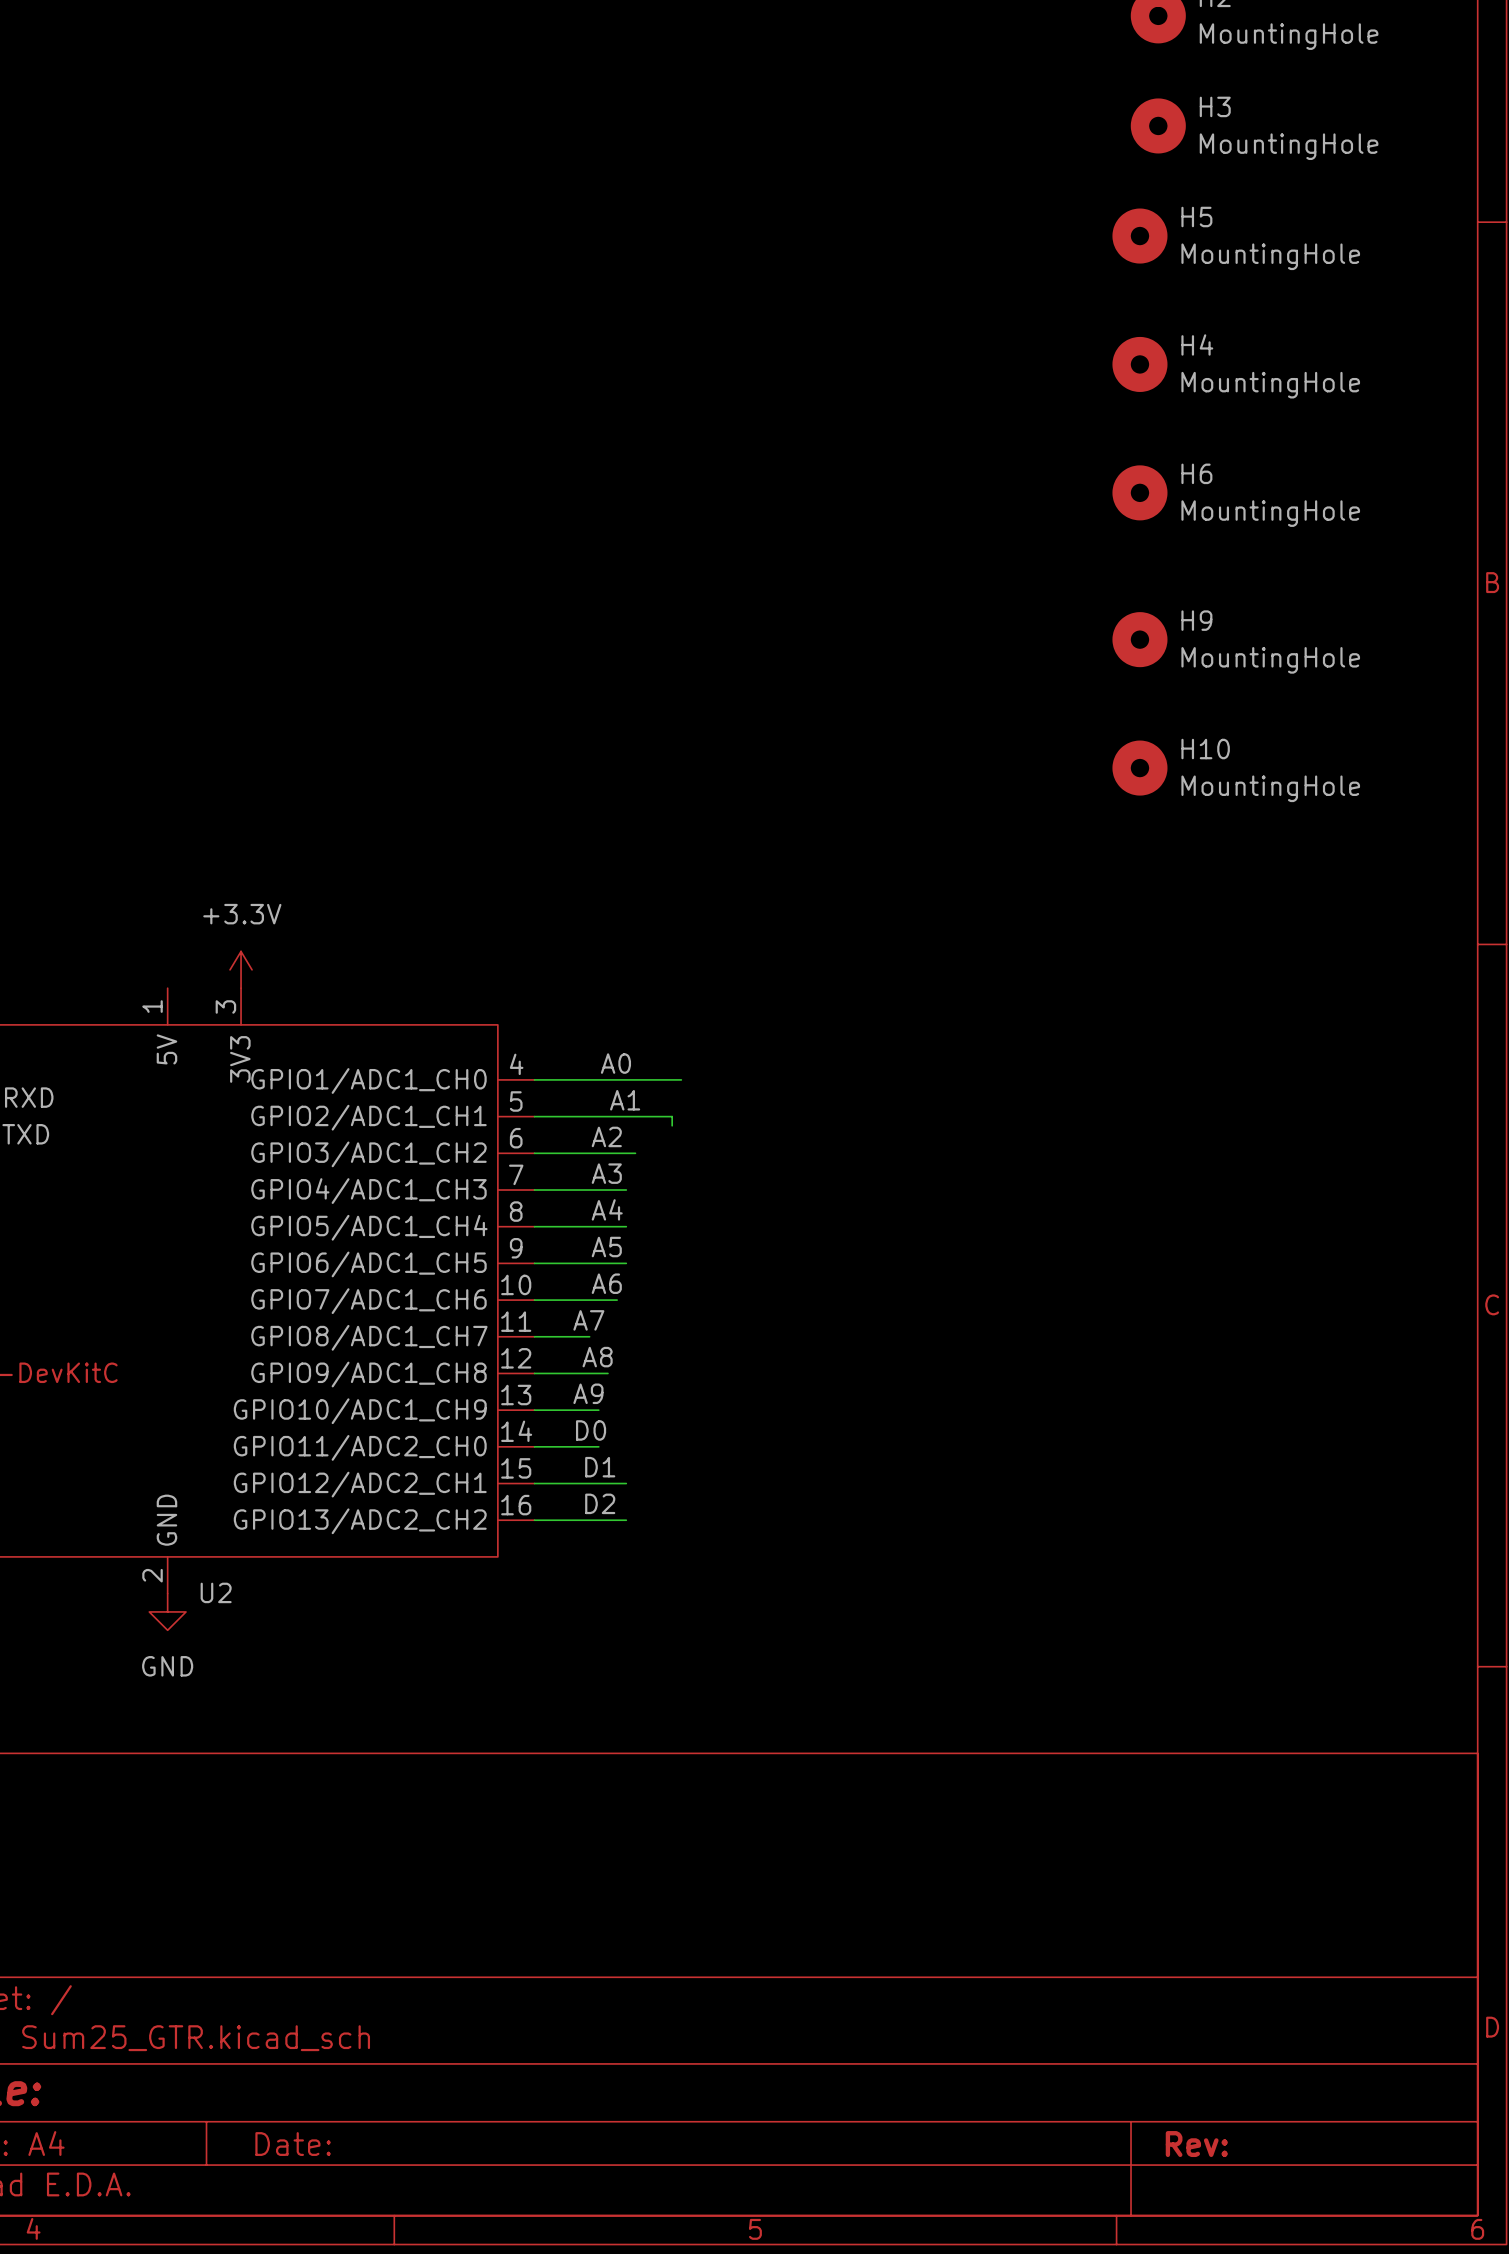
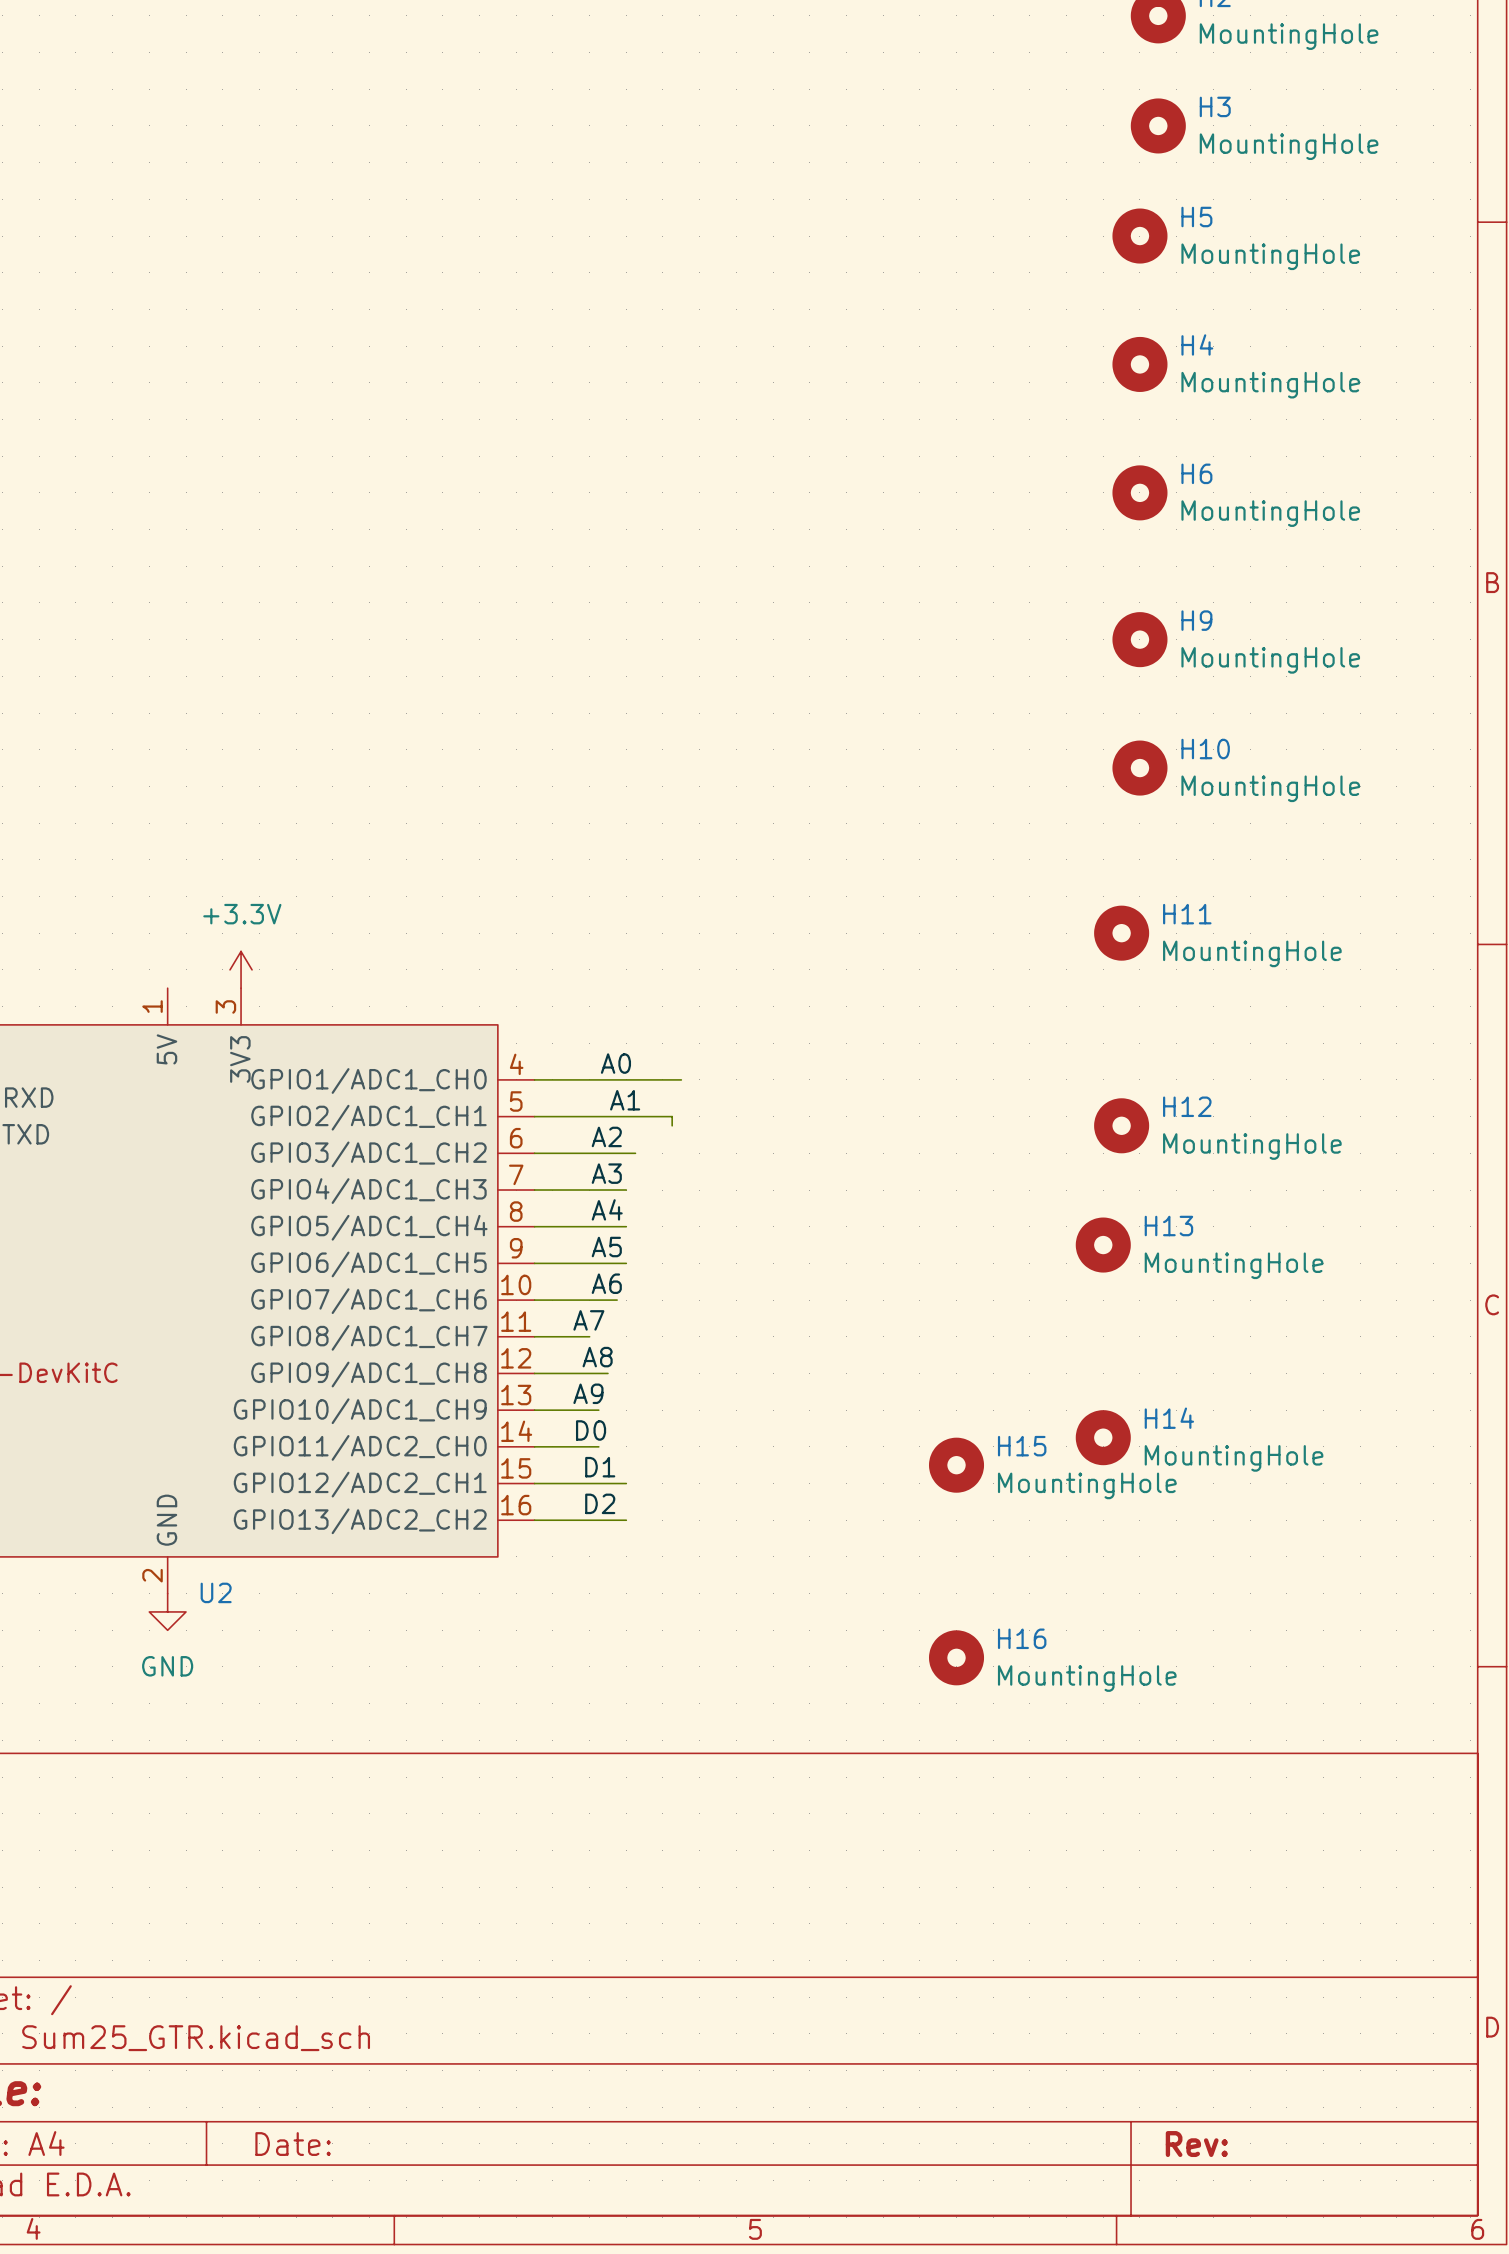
H11: none -> MountingHole (1121, 933)
H12: none -> MountingHole (1121, 1125)
H13: none -> MountingHole (1103, 1245)
H14: none -> MountingHole (1103, 1437)
H15: none -> MountingHole (956, 1465)
H16: none -> MountingHole (956, 1657)

